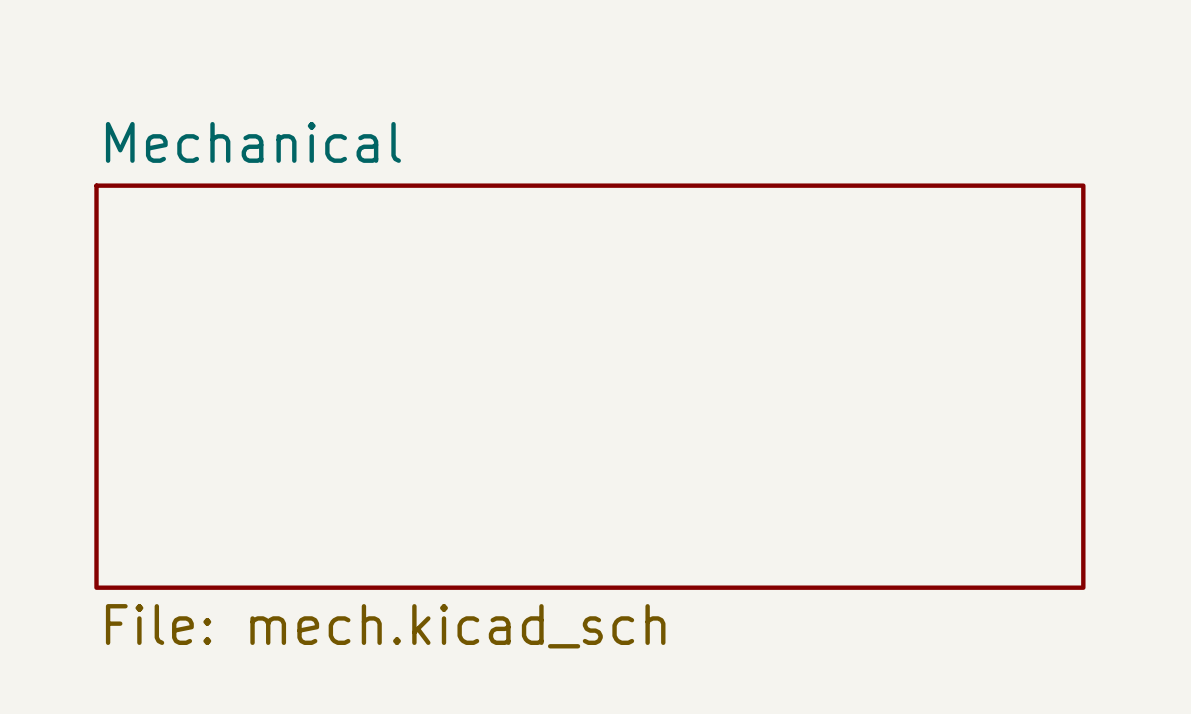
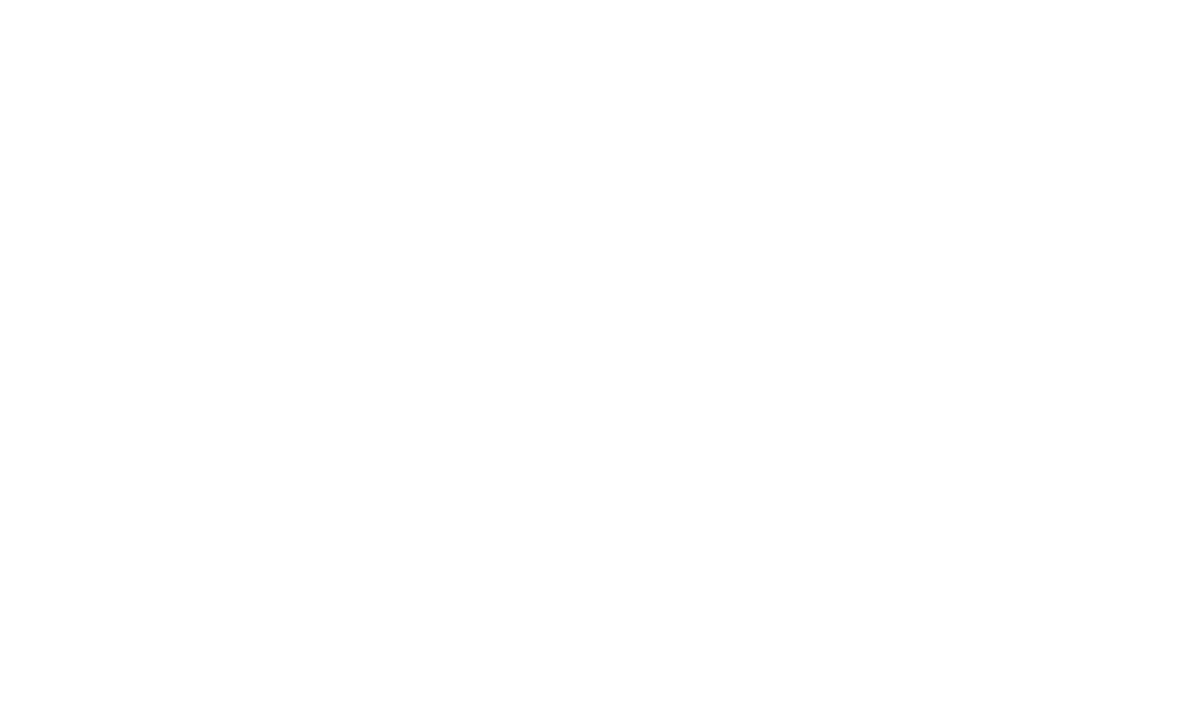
sheet Mechanical: File: mech.kicad_sch (589, 386) -> none

